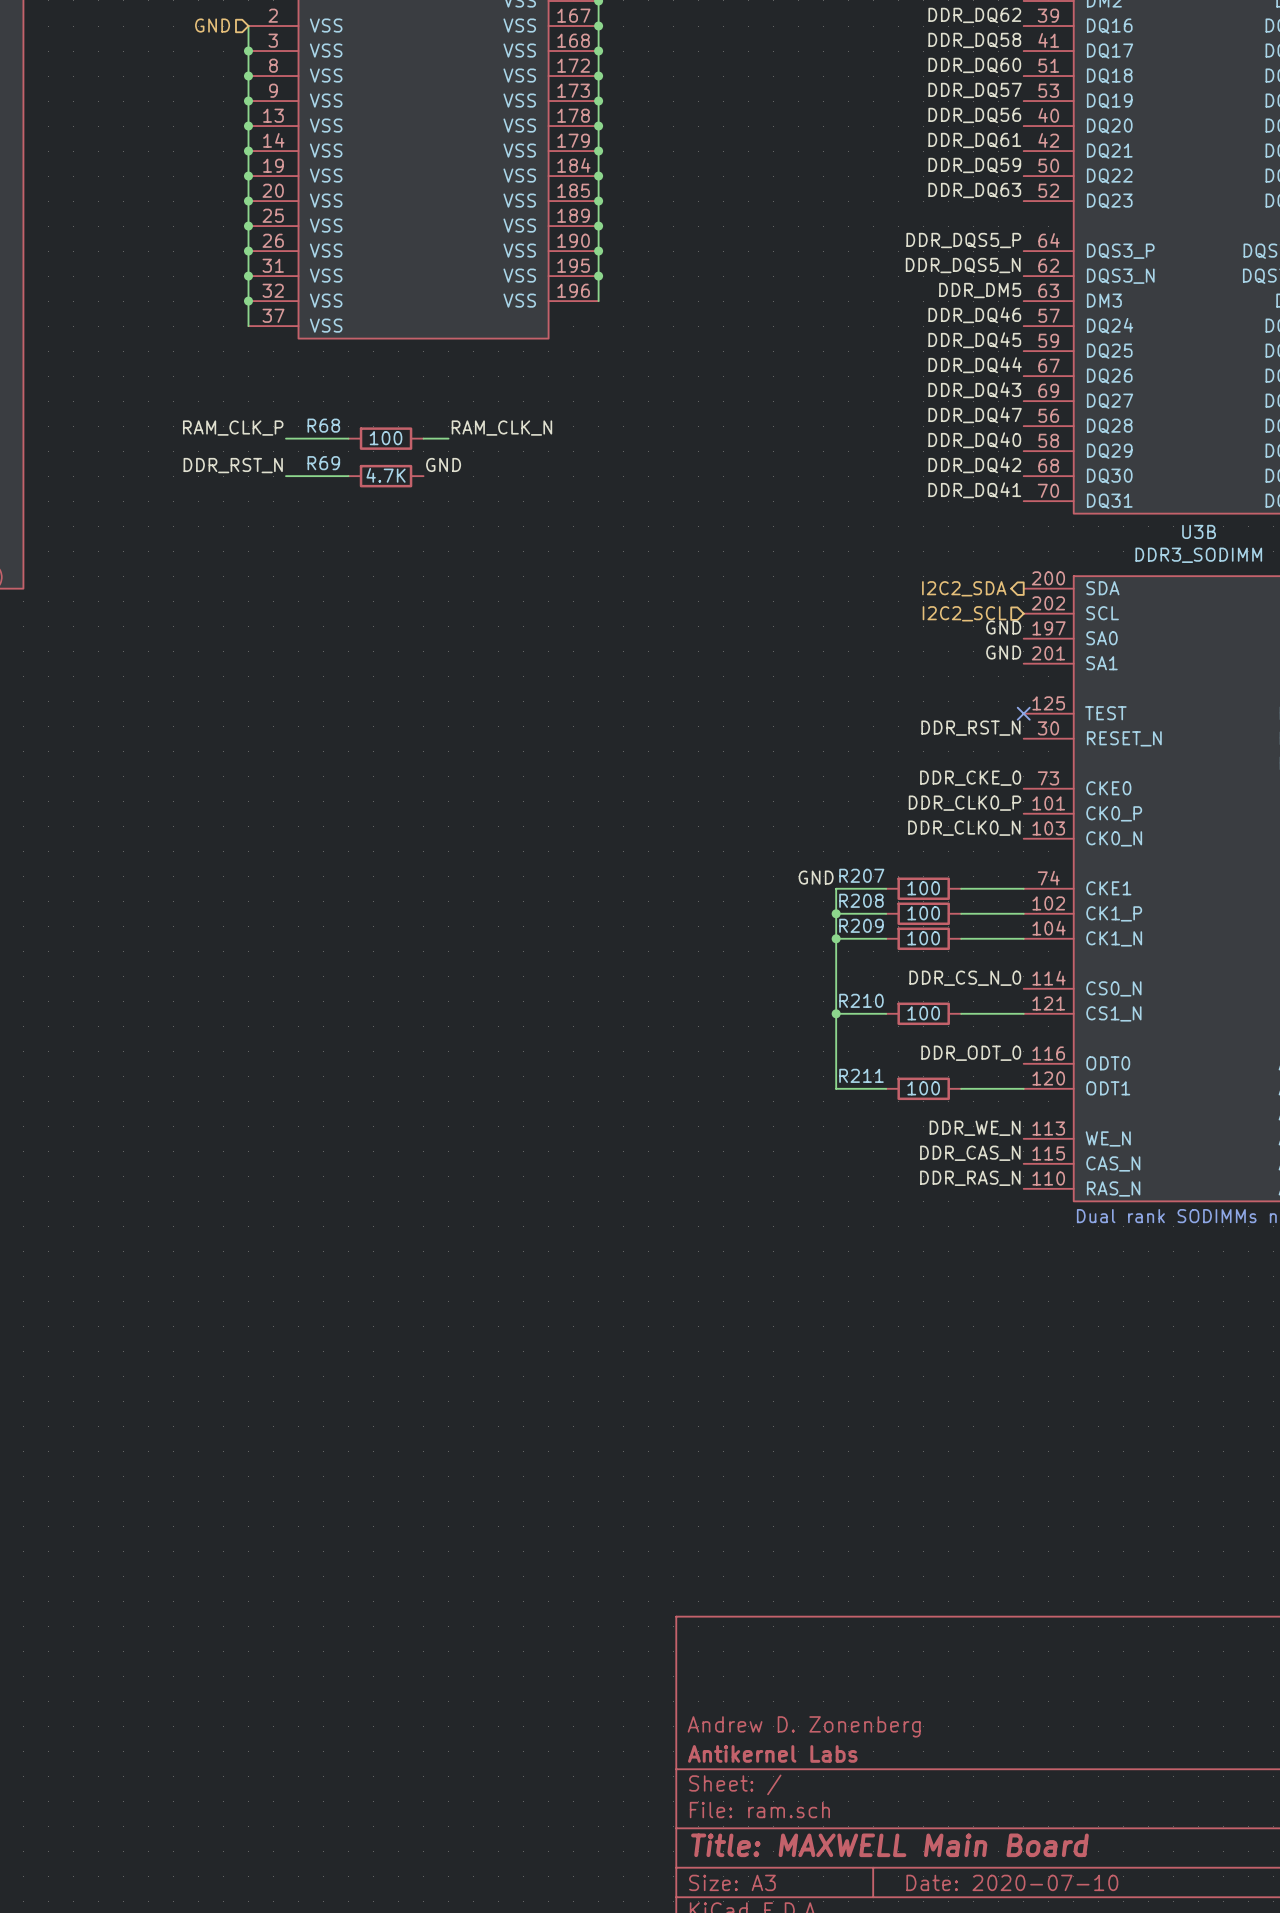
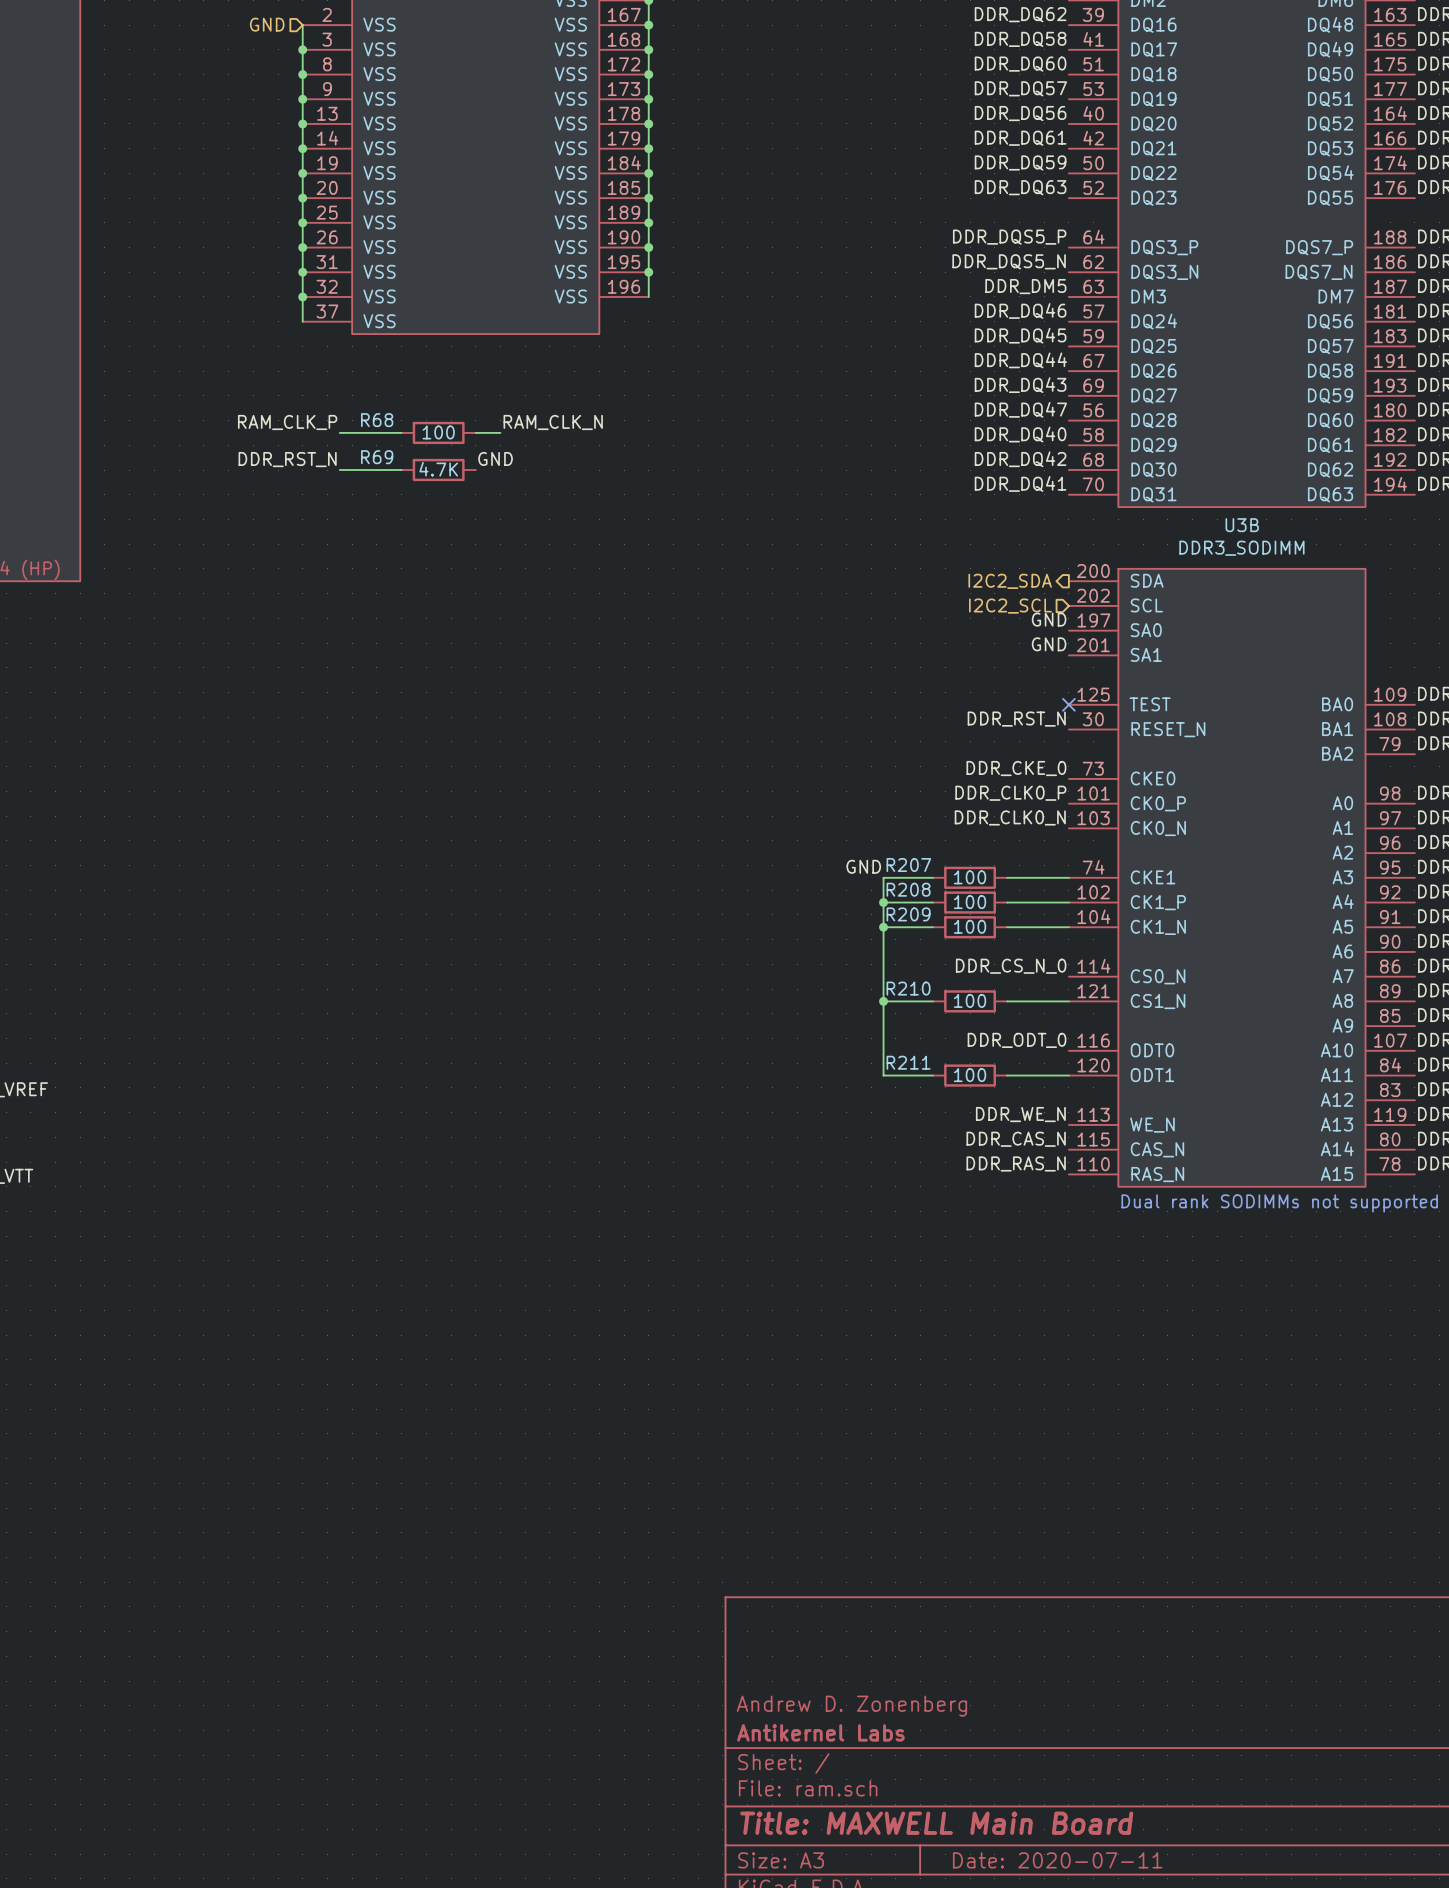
title block: Date: 2020-07-10 (1012, 1882) -> Date: 2020-07-11 (1057, 1860)

